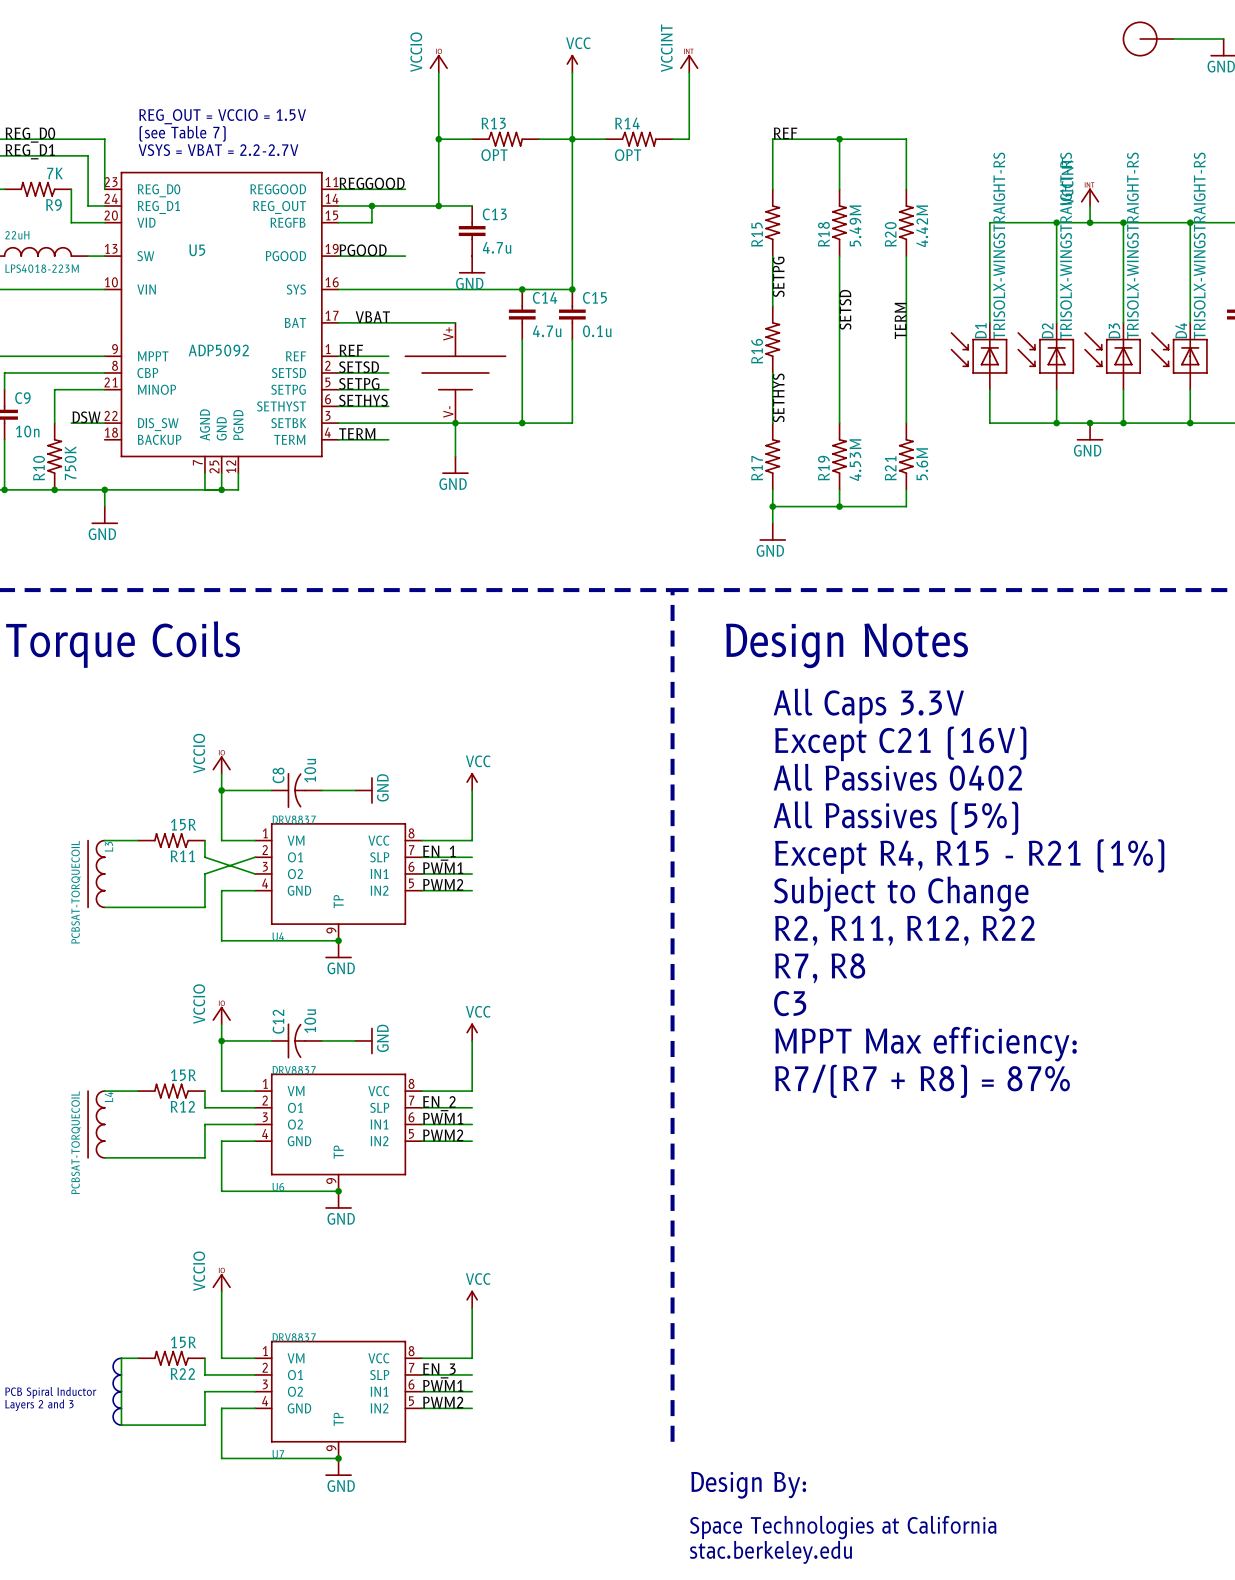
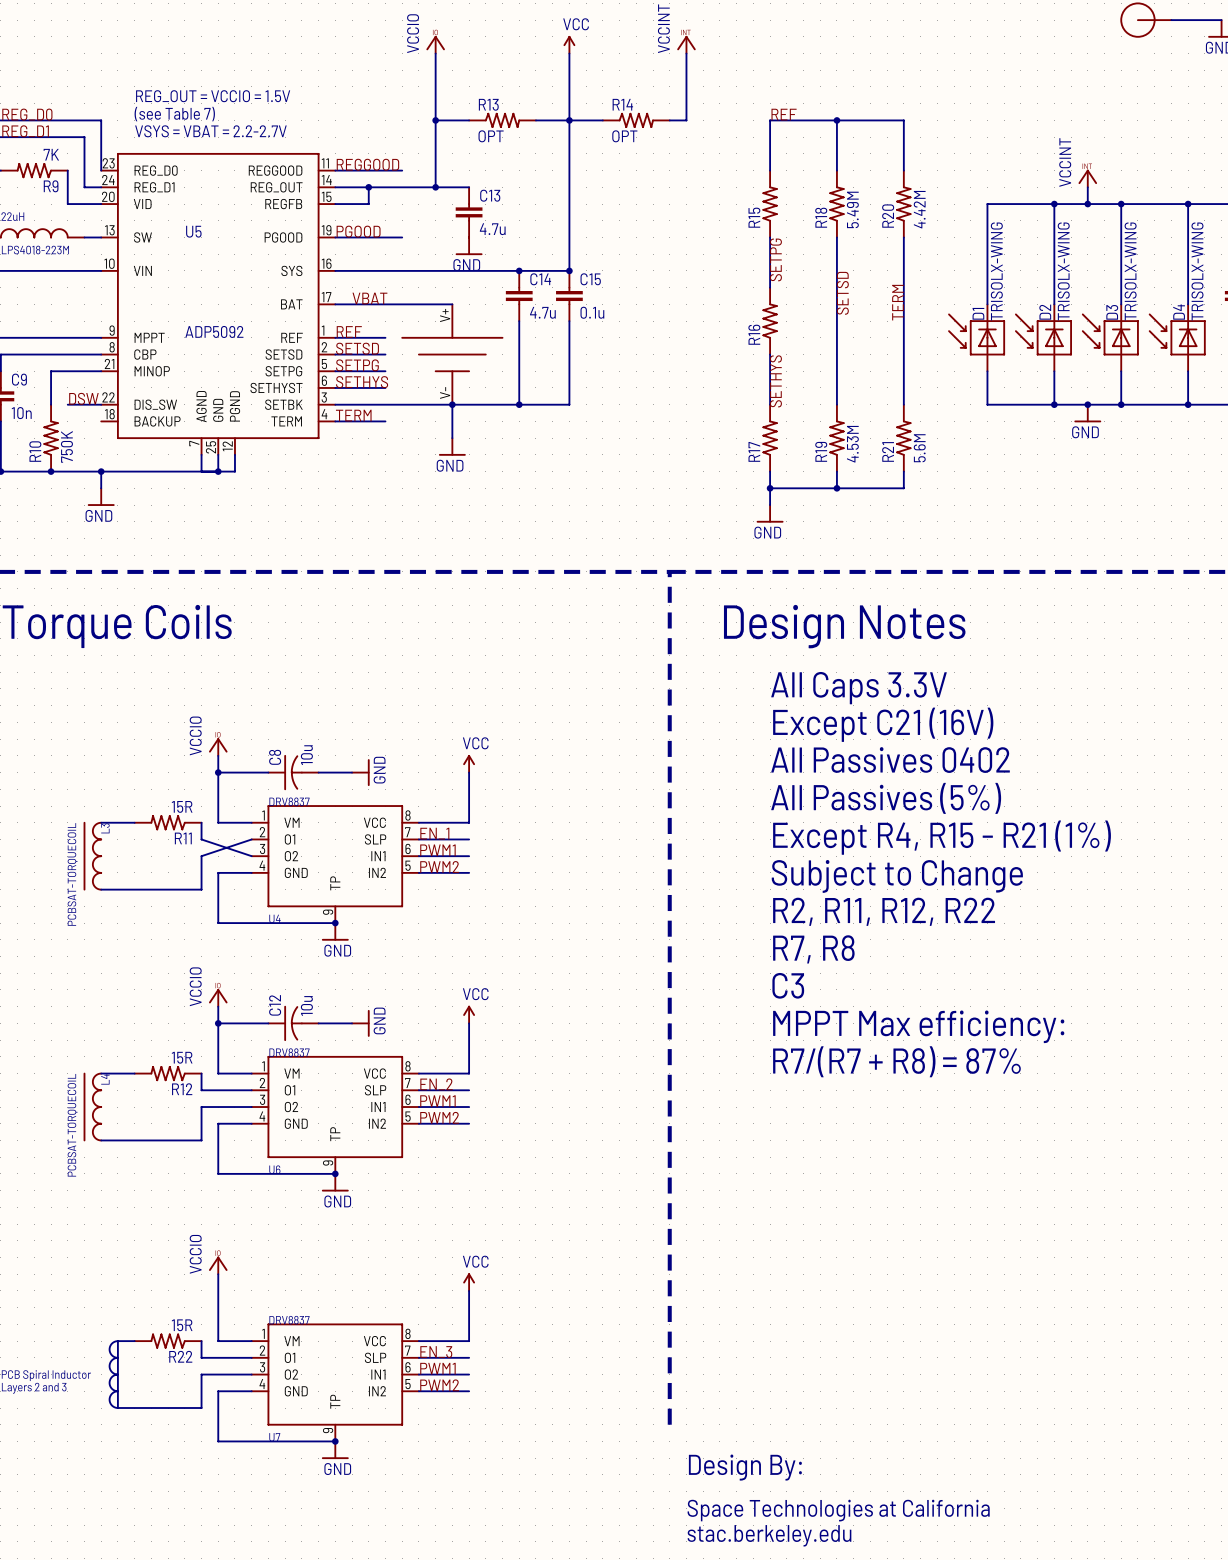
D1 value: TRISOLX-WINGSTRAIGHT-RS (999, 245) -> TRISOLX-WING (996, 271)
D2 value: TRISOLX-WINGSTRAIGHT-RS (1066, 245) -> TRISOLX-WING (1063, 271)
D3 value: TRISOLX-WINGSTRAIGHT-RS (1132, 245) -> TRISOLX-WING (1130, 271)
D4 value: TRISOLX-WINGSTRAIGHT-RS (1199, 245) -> TRISOLX-WING (1197, 271)

